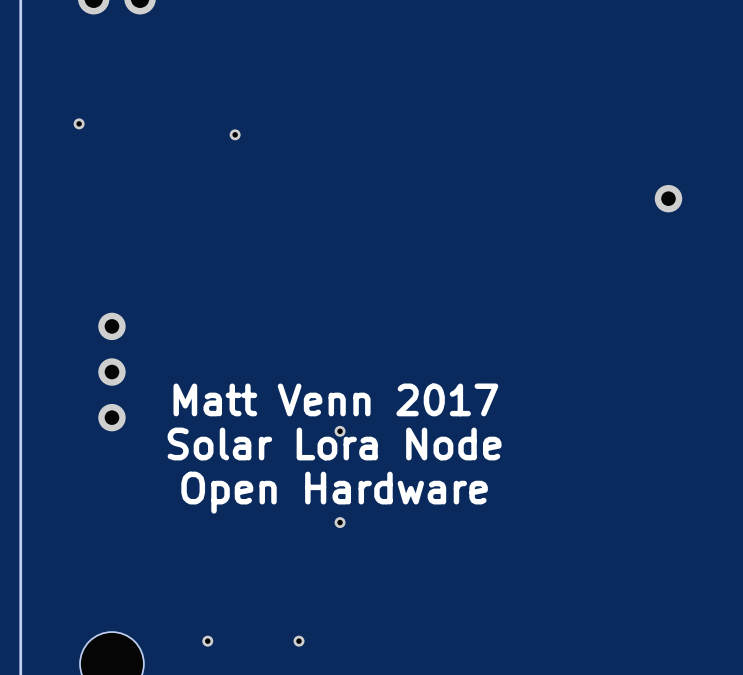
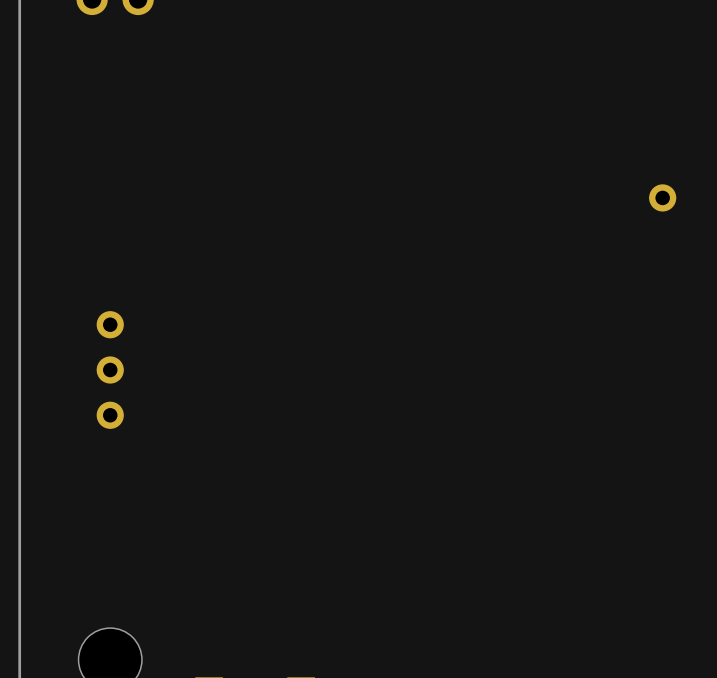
part: (79, 123) -> none
part: (235, 134) -> none
text: Matt Venn 2017 (335, 399) -> none
part: (340, 431) -> none
text: Solar Lora Node (334, 443) -> none
text: Open Hardware (334, 492) -> none
part: (340, 522) -> none
part: (207, 641) -> none
part: (299, 641) -> none

